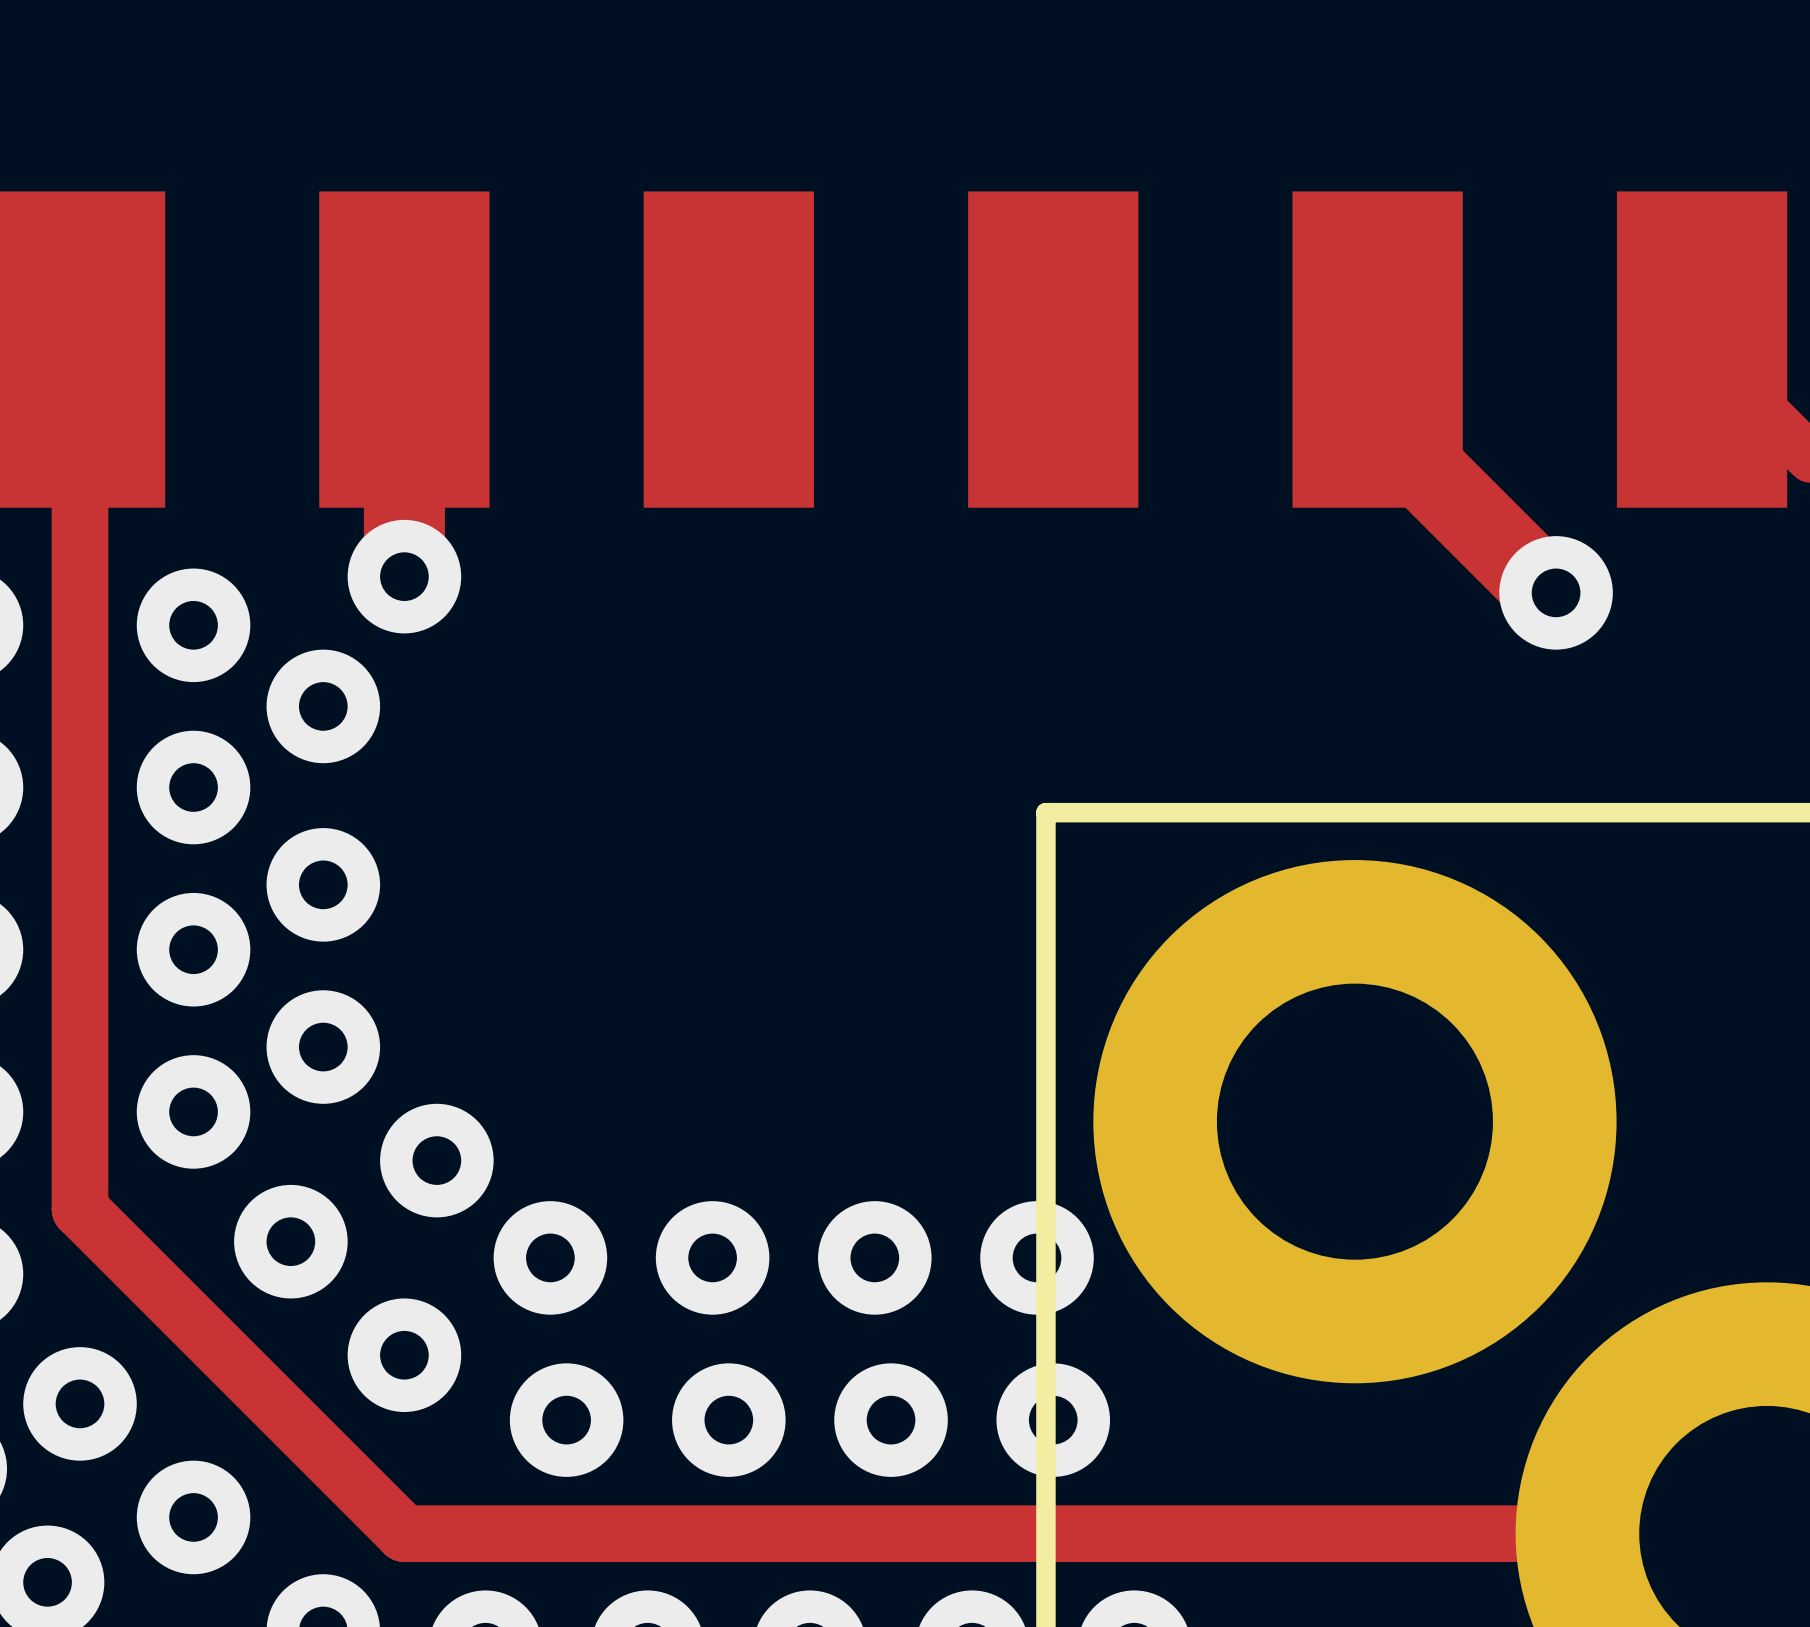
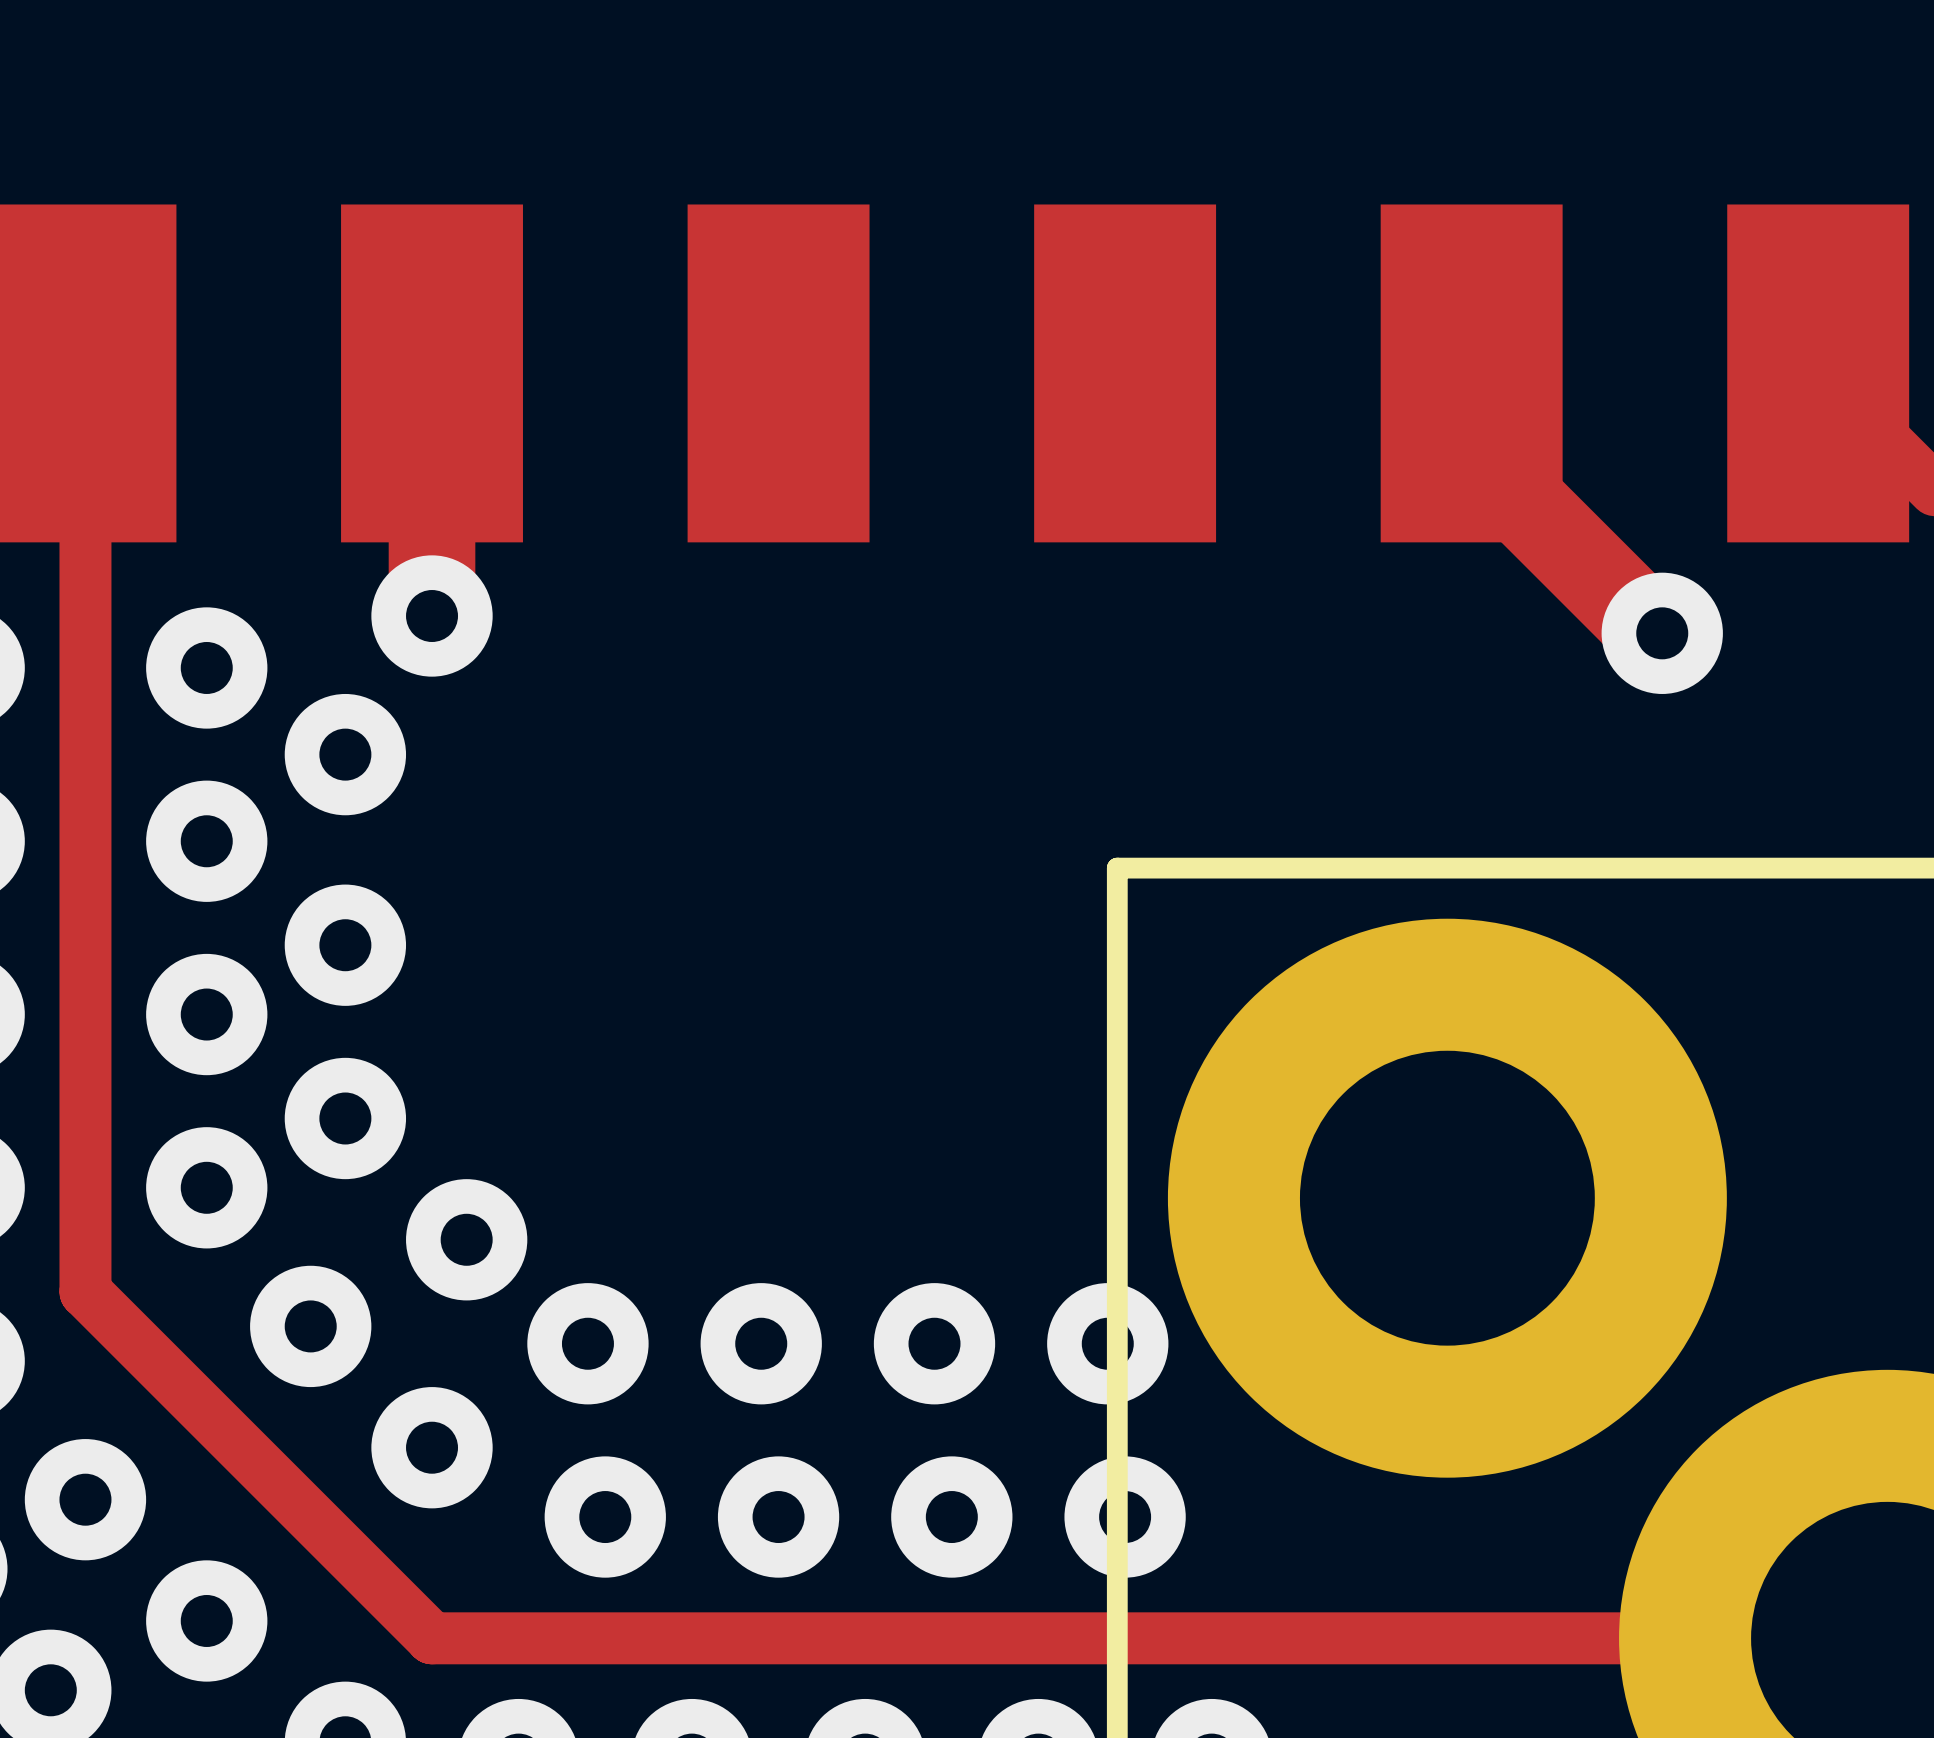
track width: thick (80, 349) (80, 1209) (404, 1533) (1766, 1533) -> thin (85, 373) (85, 1291) (432, 1638) (1887, 1638)

